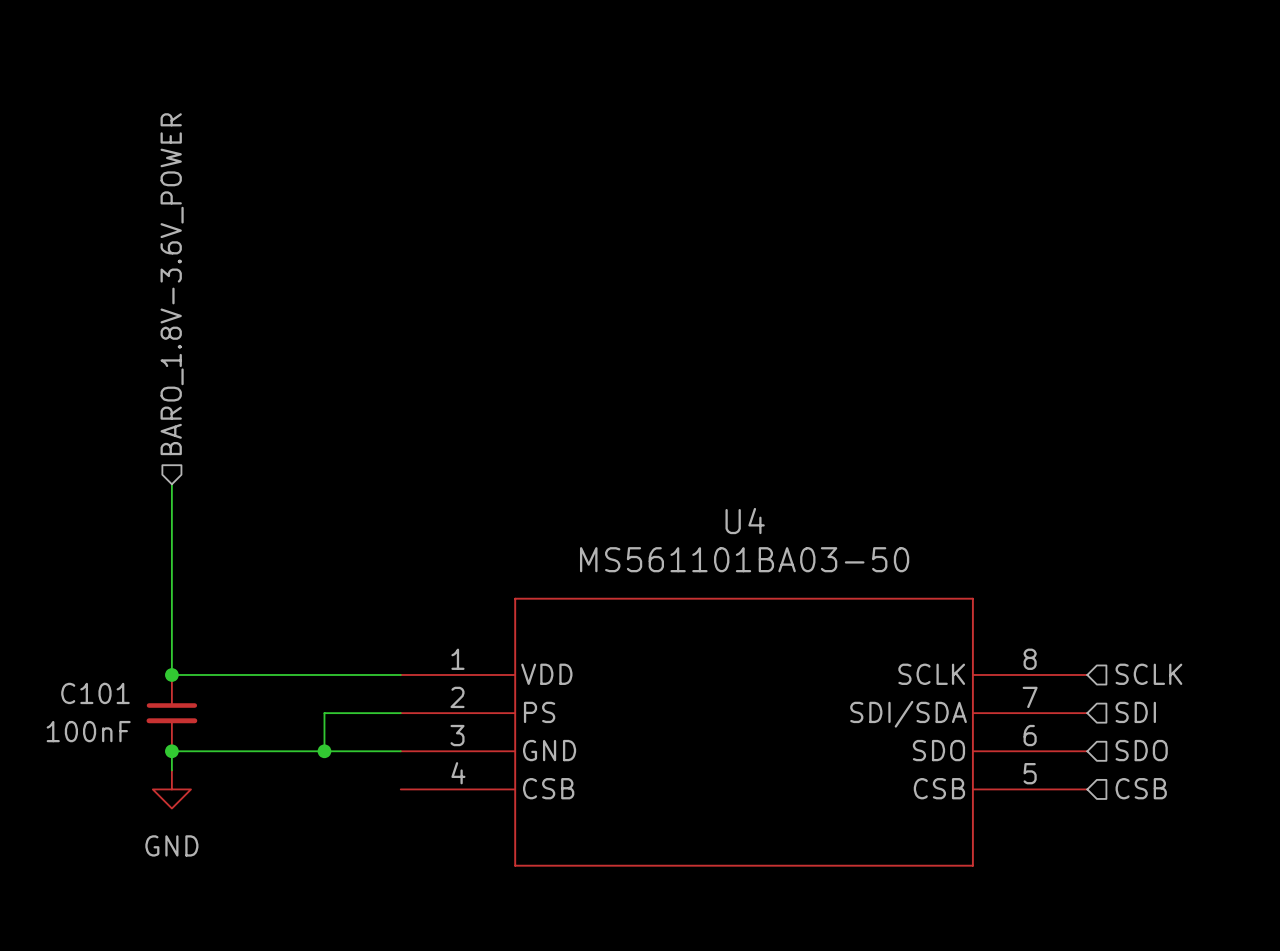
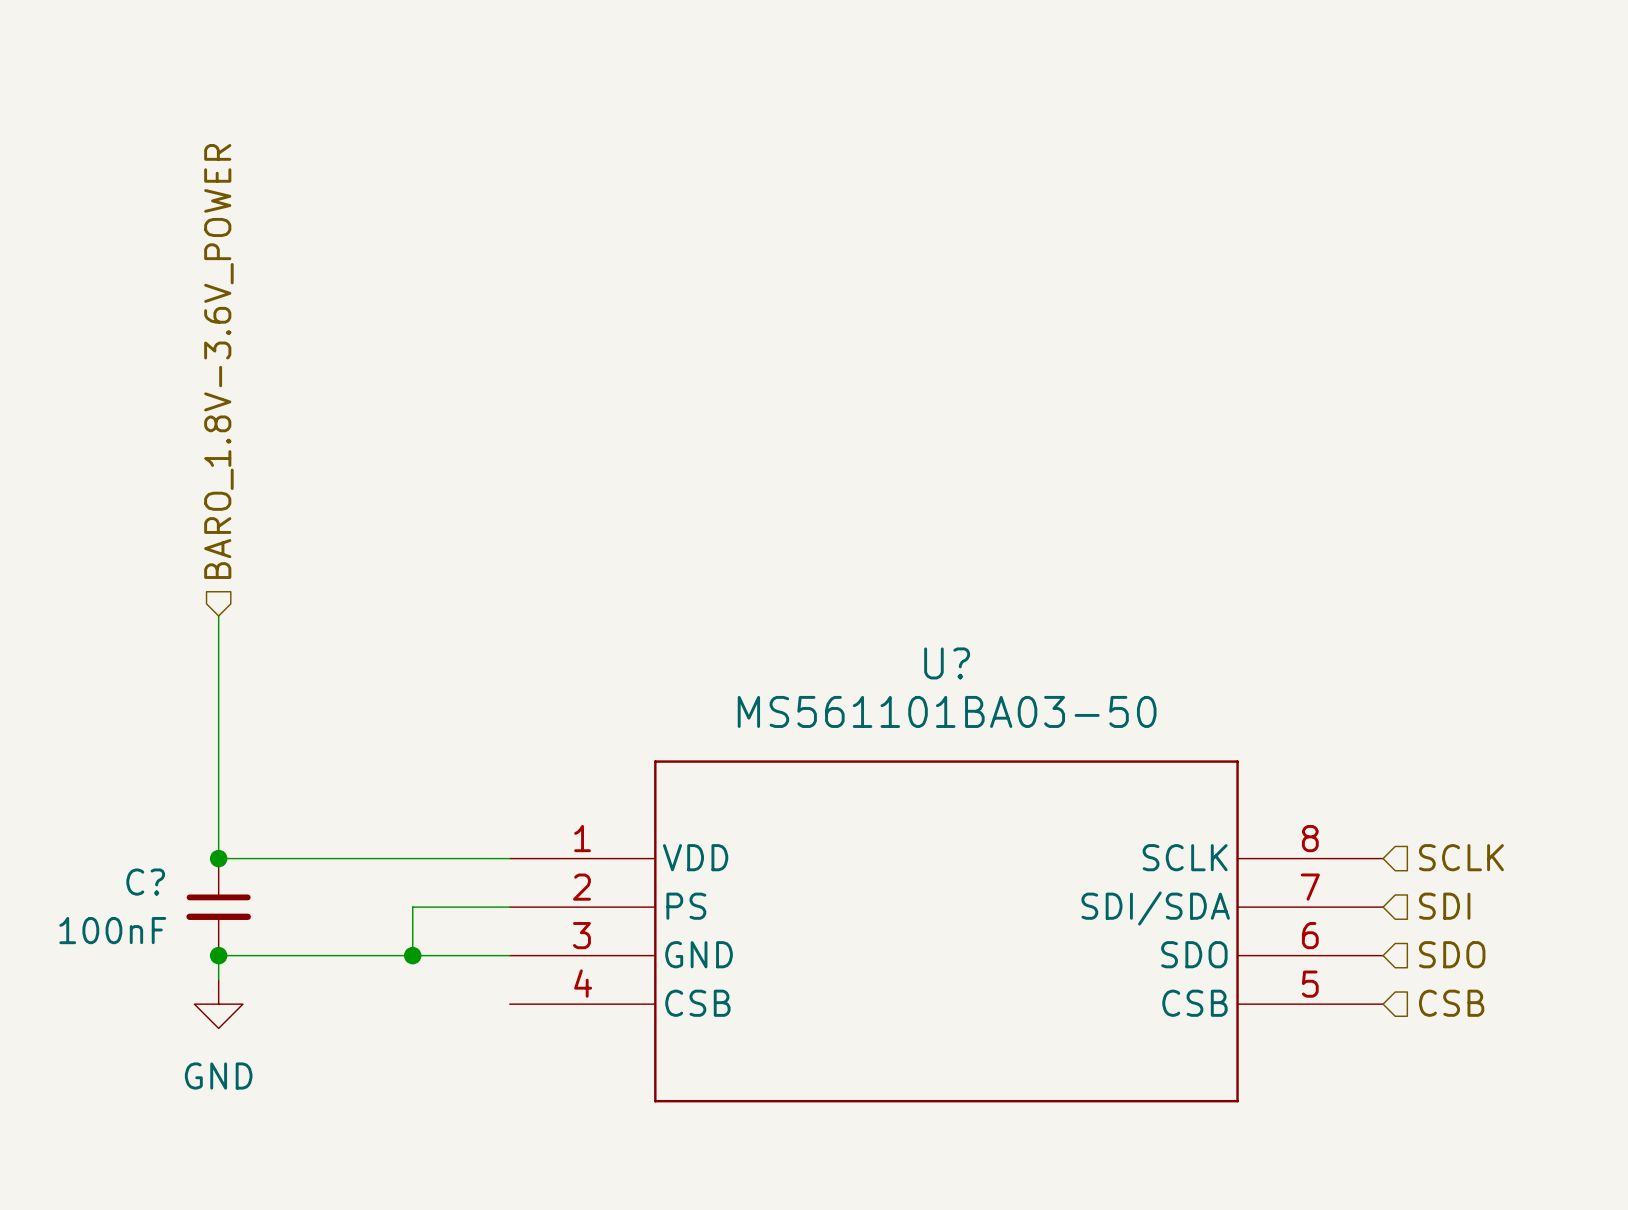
U4 name: U4 (745, 521) -> U? (947, 663)
C101 name: C101 (95, 693) -> C? (145, 882)

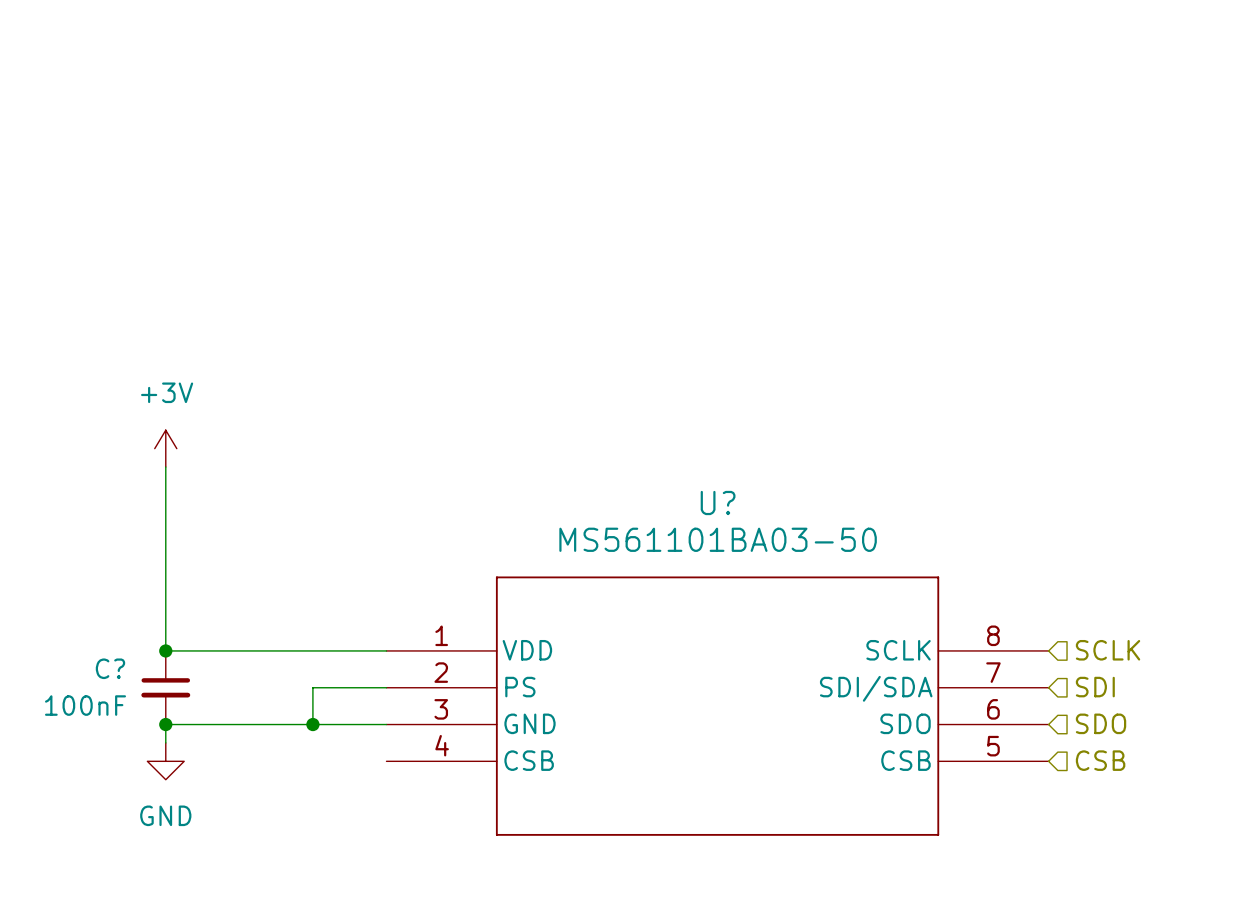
hierarchical label: BARO_1.8V-3.6V_POWER (218, 361) -> none
power symbol: none -> +3V (165, 448)

